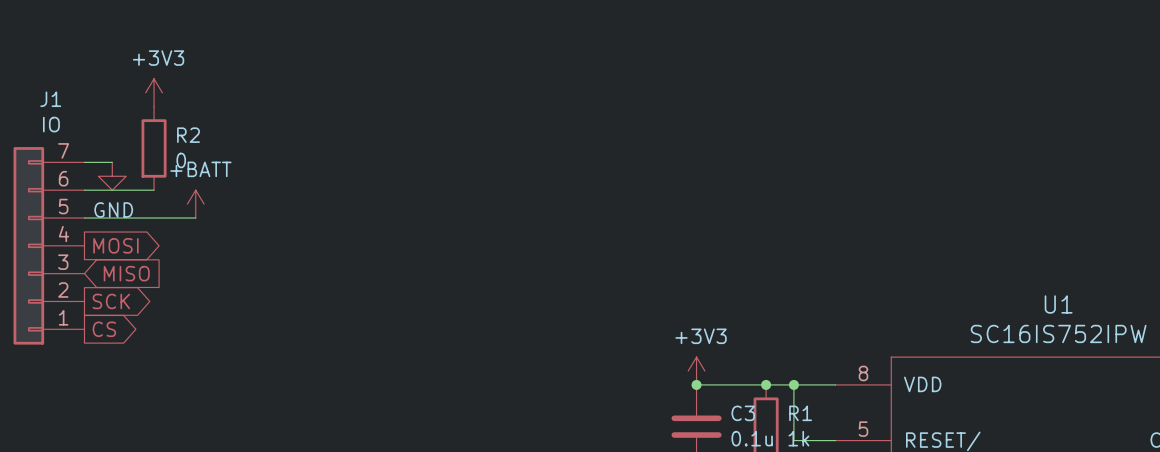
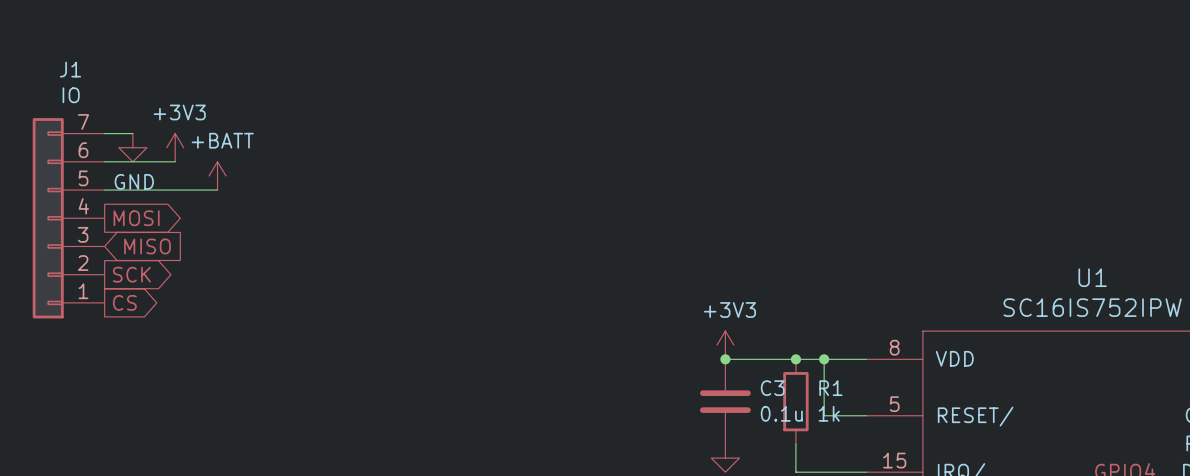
power symbol position: +3V3 (154, 92) -> +3V3 (175, 147)
R2: 0 (154, 148) -> none

